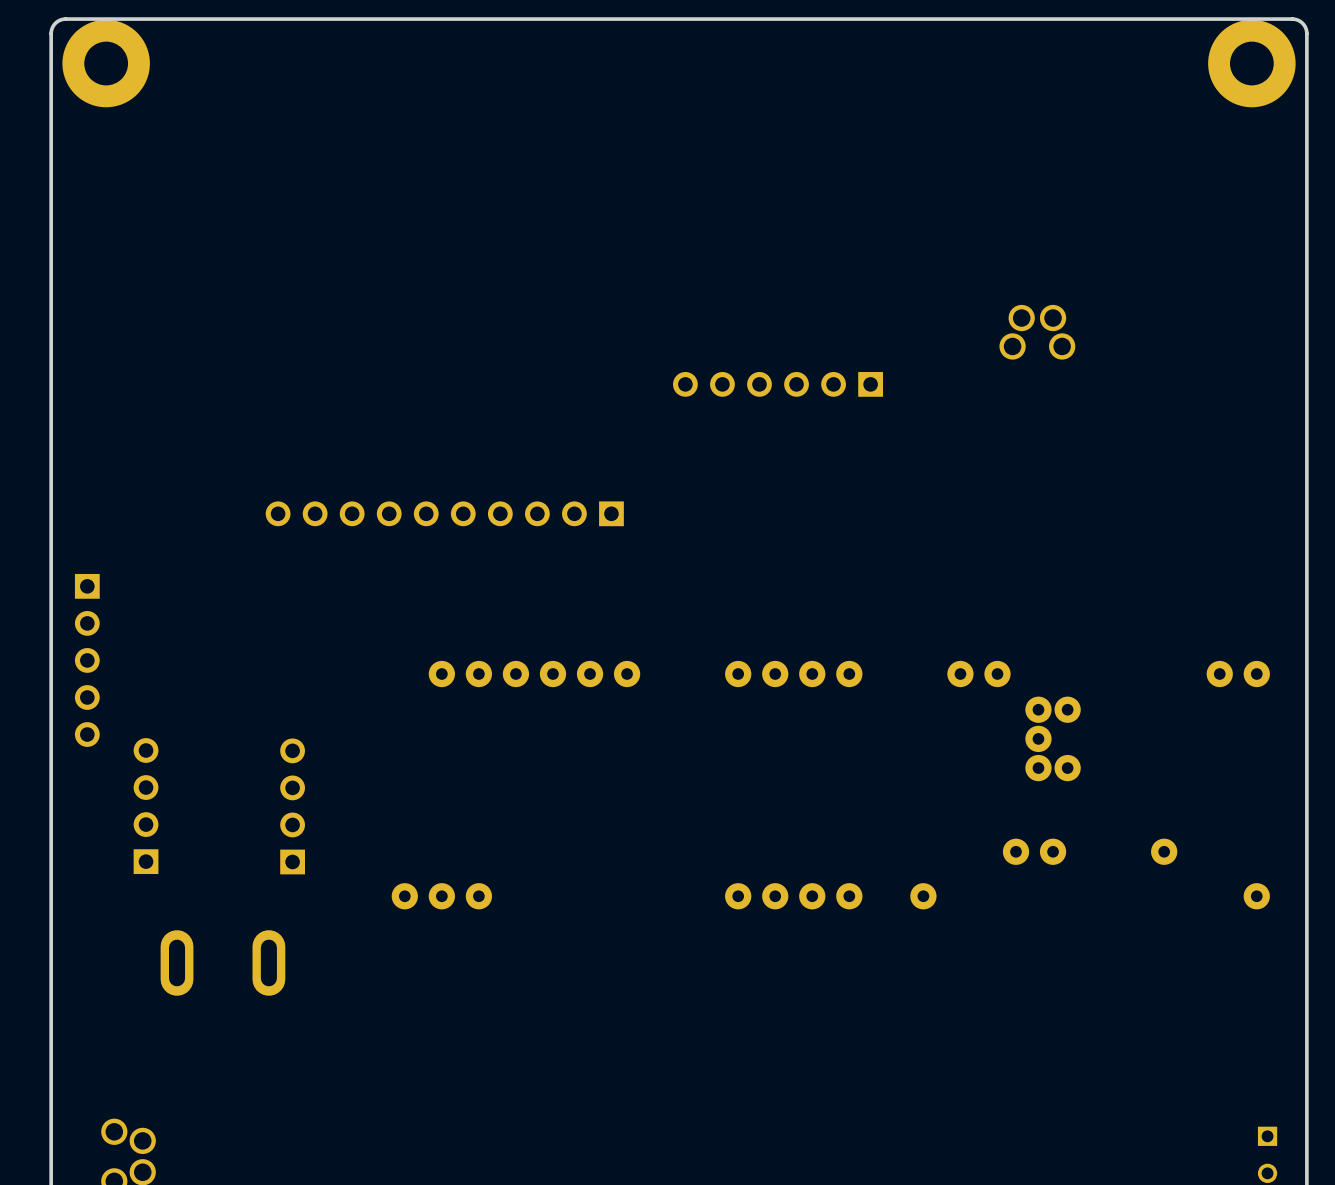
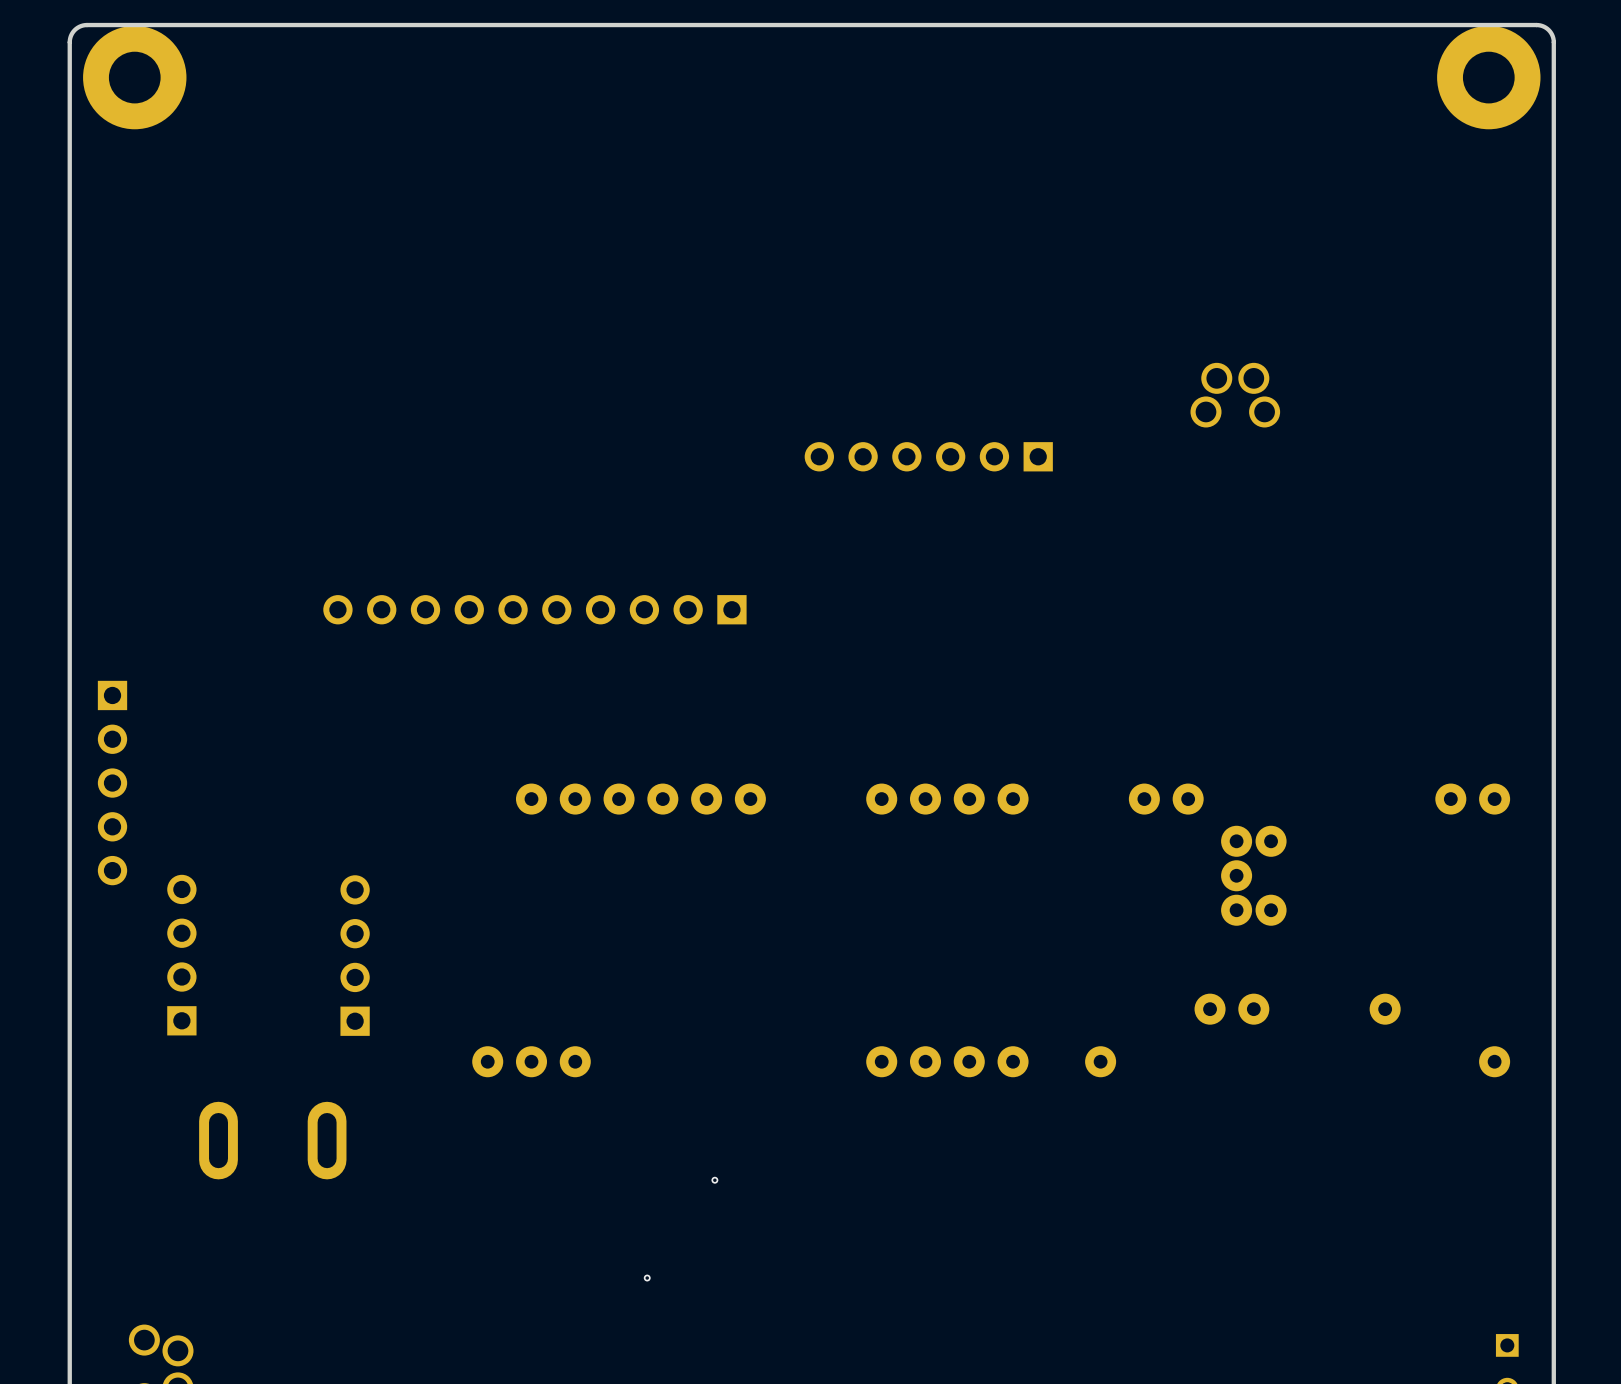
via: none -> (714, 1180)
via: none -> (647, 1278)

